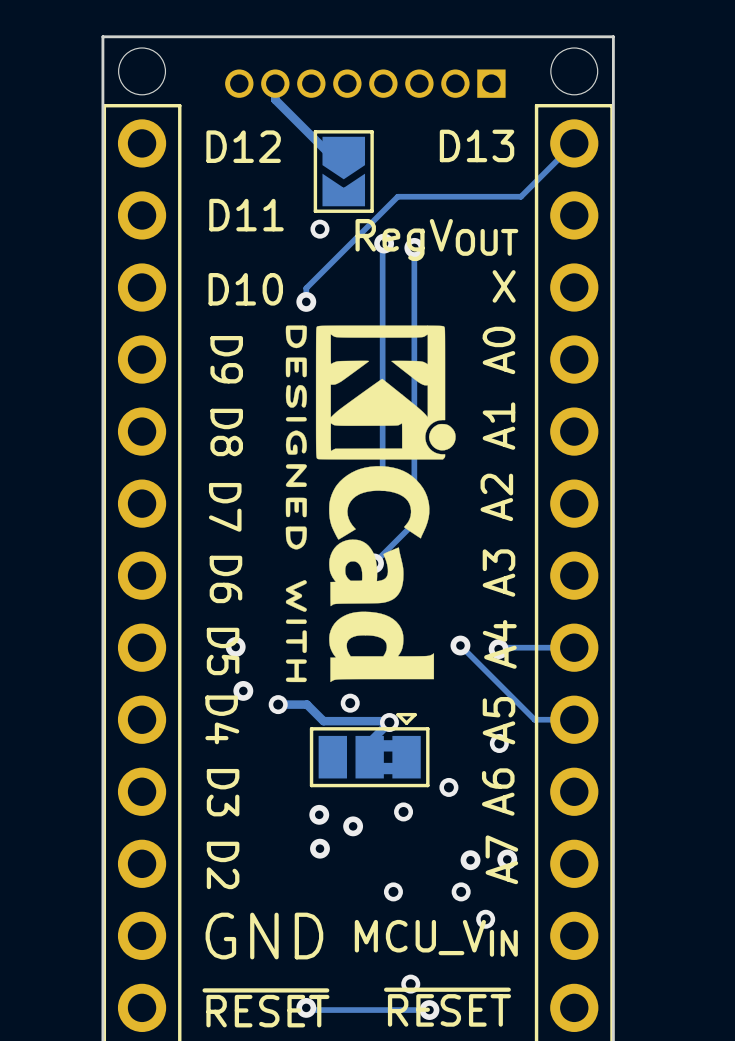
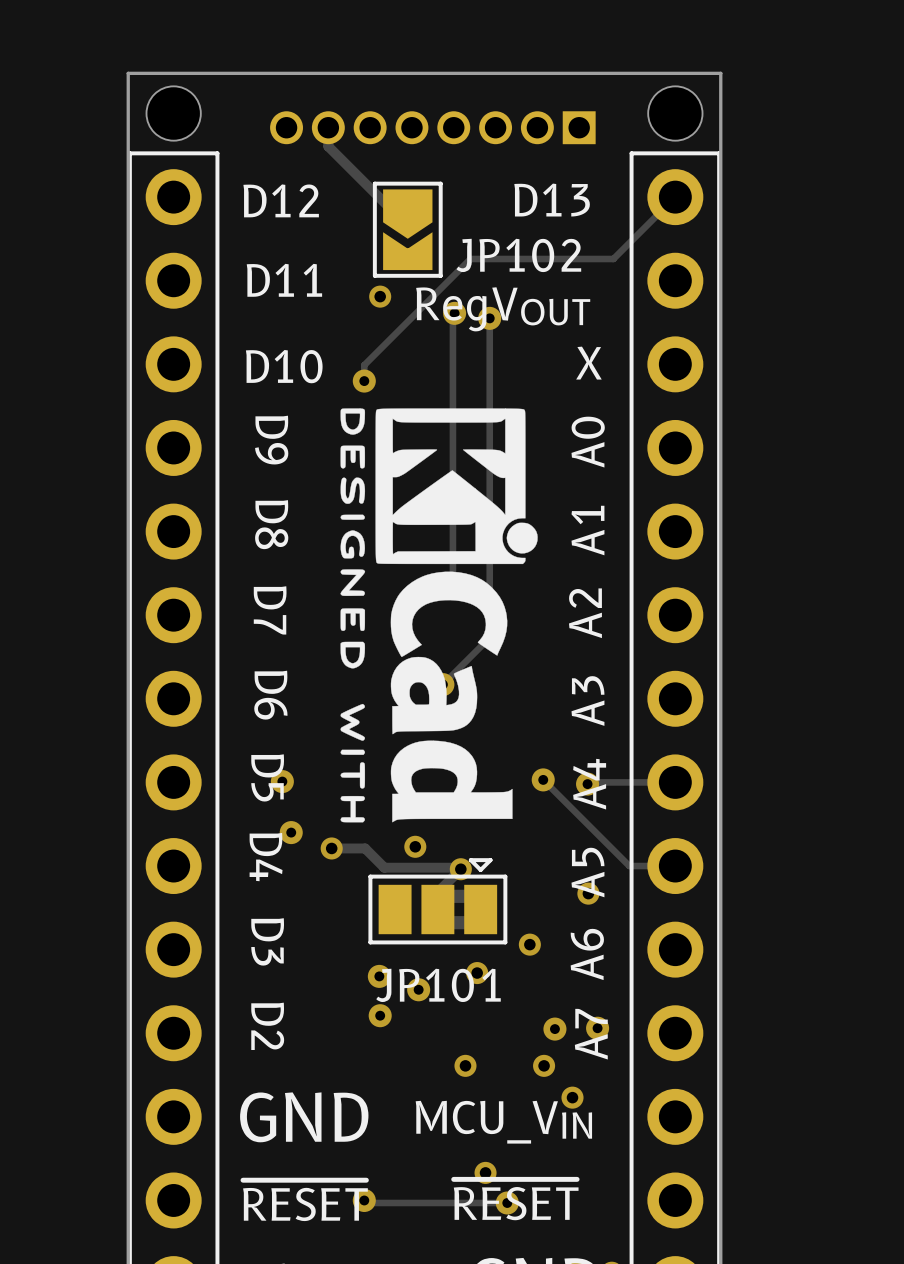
JP102 name: none -> JP102 (518, 255)
JP101 name: none -> JP101 (438, 985)

